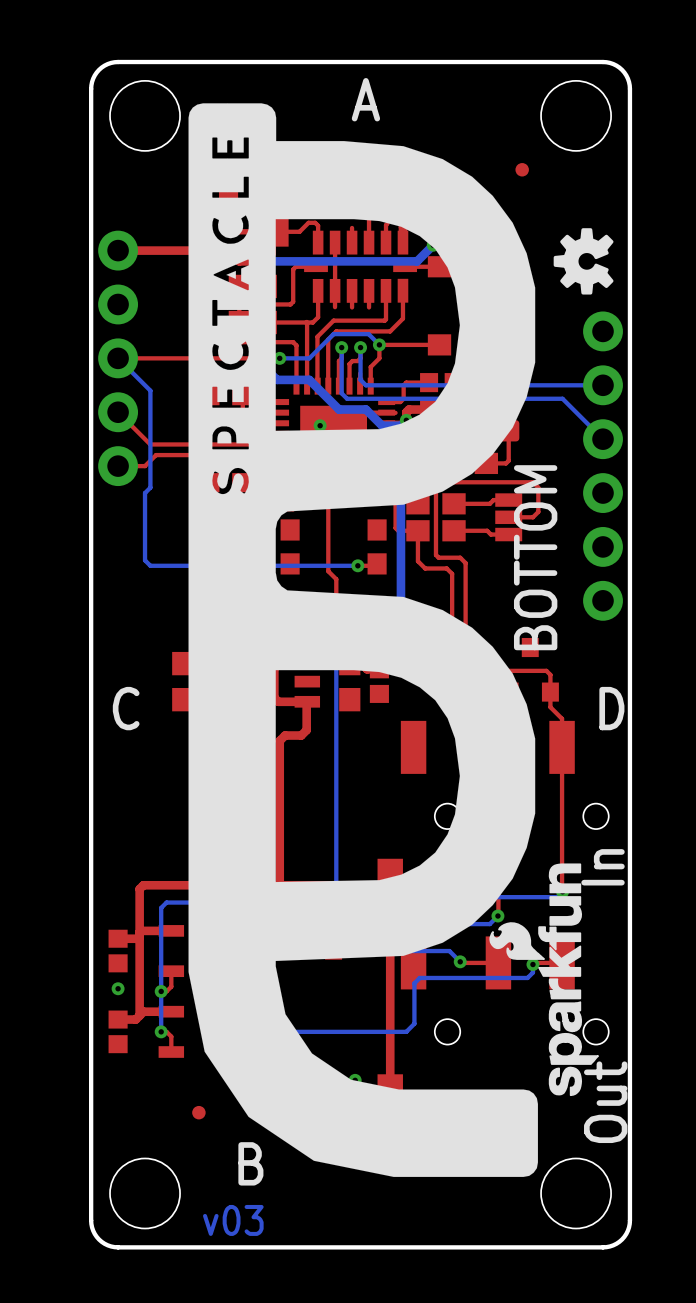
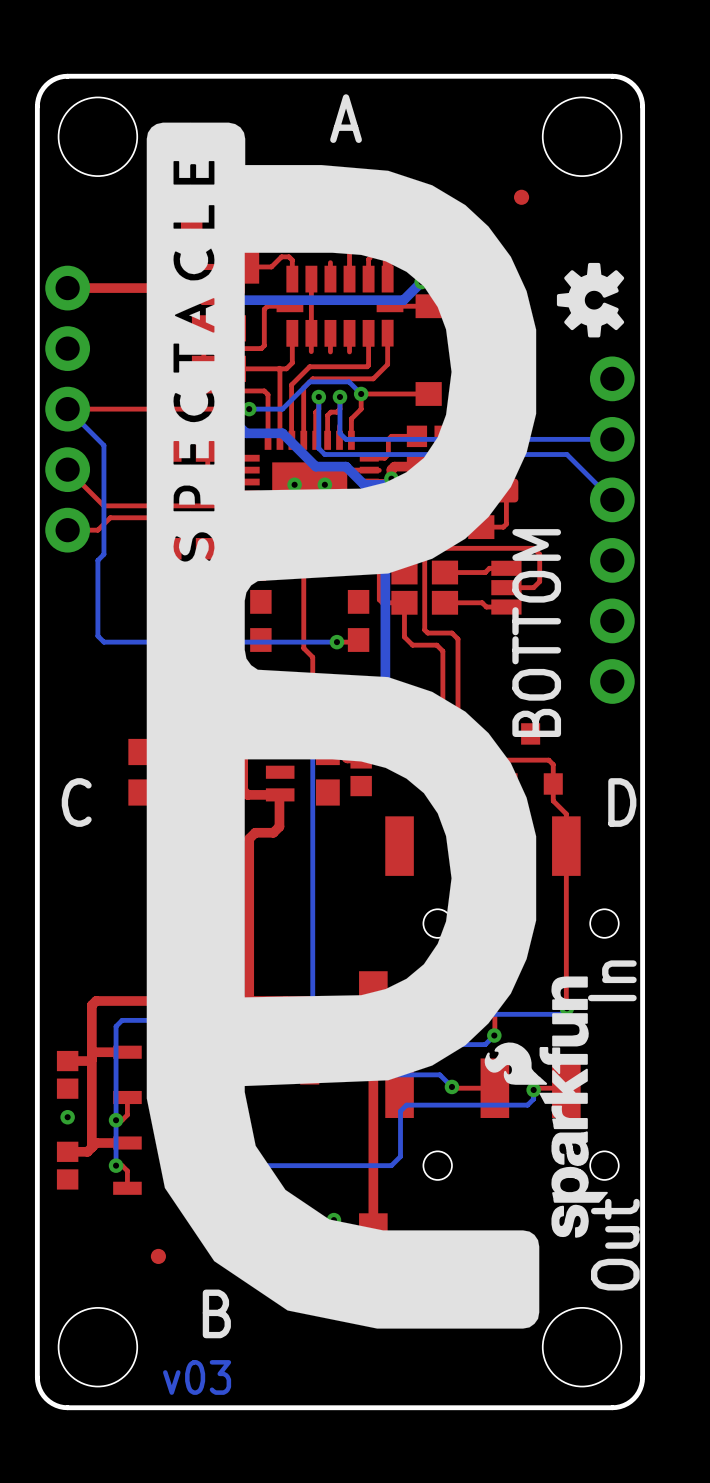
via: none -> (324, 484)

